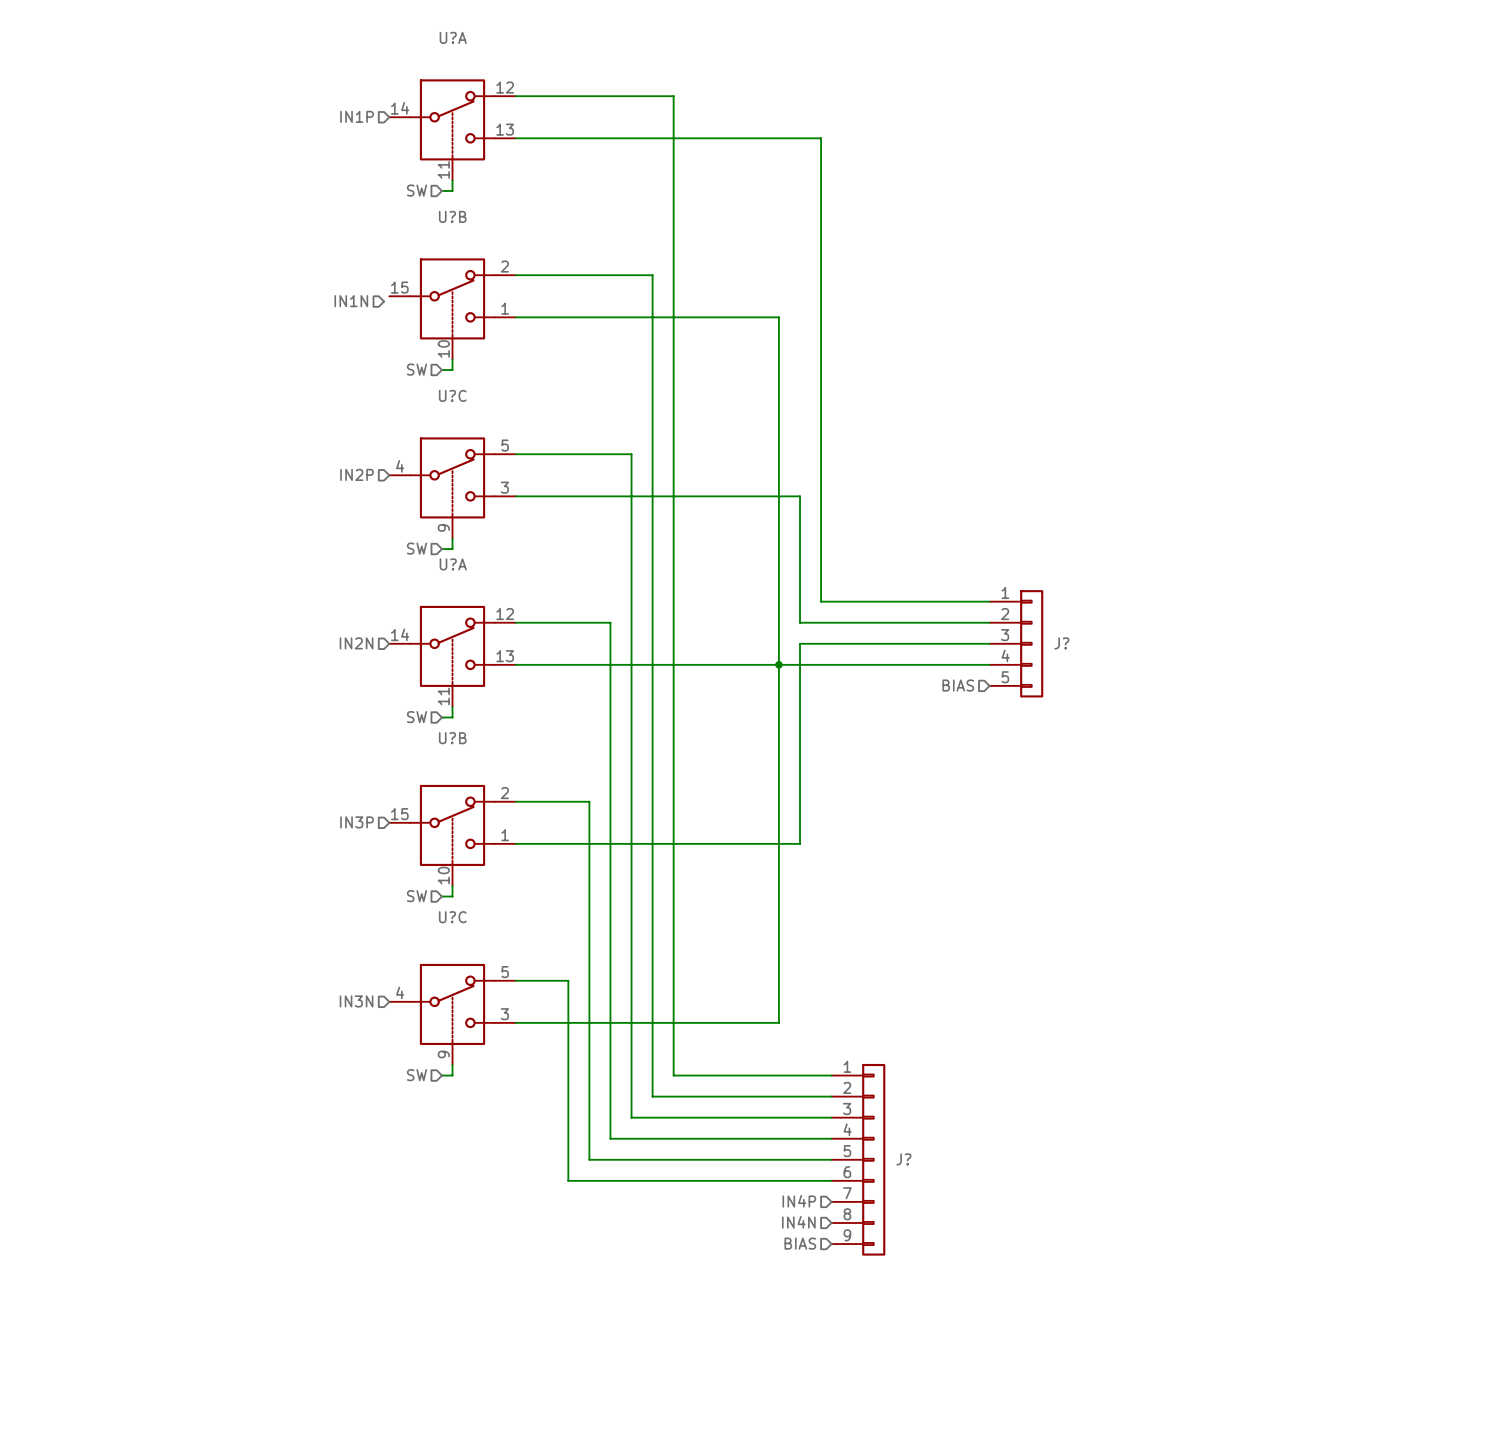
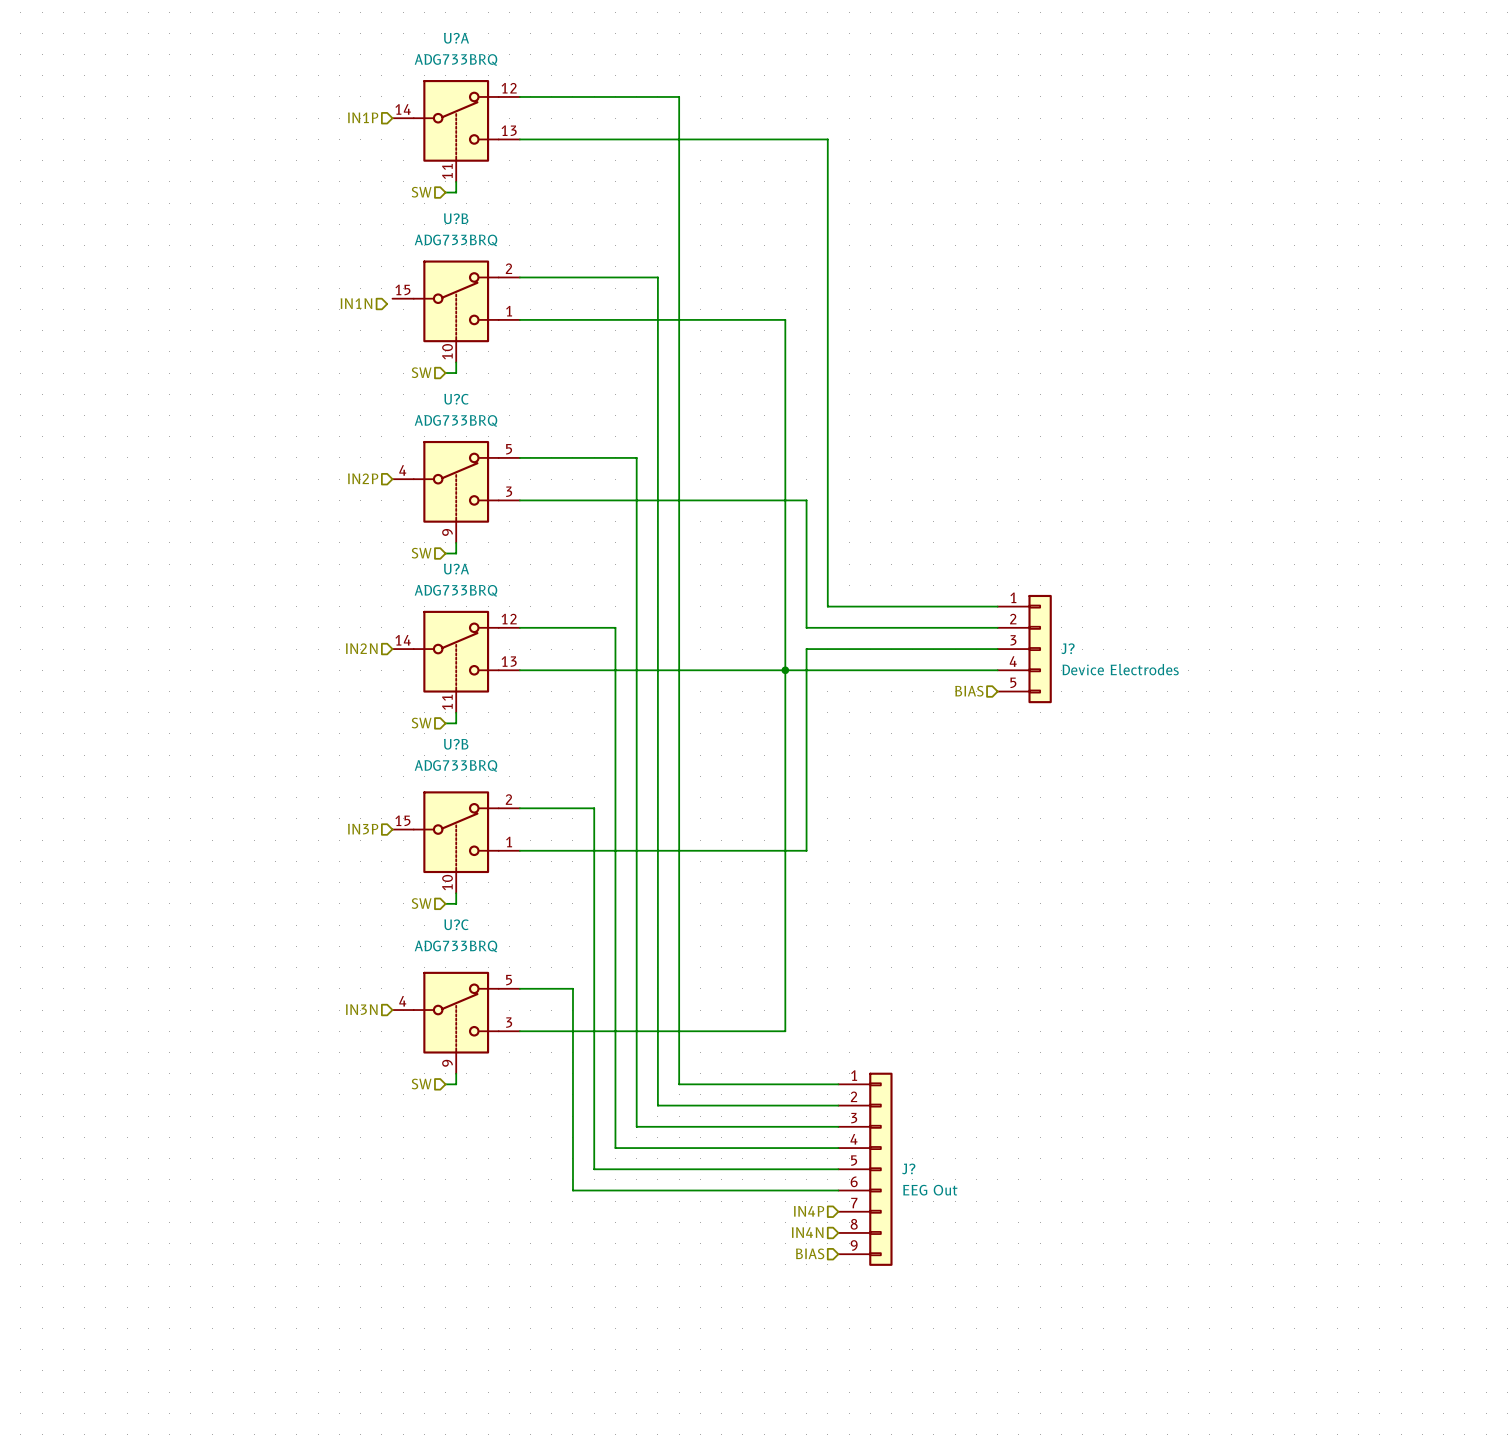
U?A value: none -> ADG733BRQ (455, 59)
U?B value: none -> ADG733BRQ (455, 240)
U?C value: none -> ADG733BRQ (455, 420)
U?A value: none -> ADG733BRQ (455, 590)
J? value: none -> Device Electrodes (1120, 669)
U?B value: none -> ADG733BRQ (455, 765)
U?C value: none -> ADG733BRQ (455, 946)
J? value: none -> EEG Out (930, 1190)

